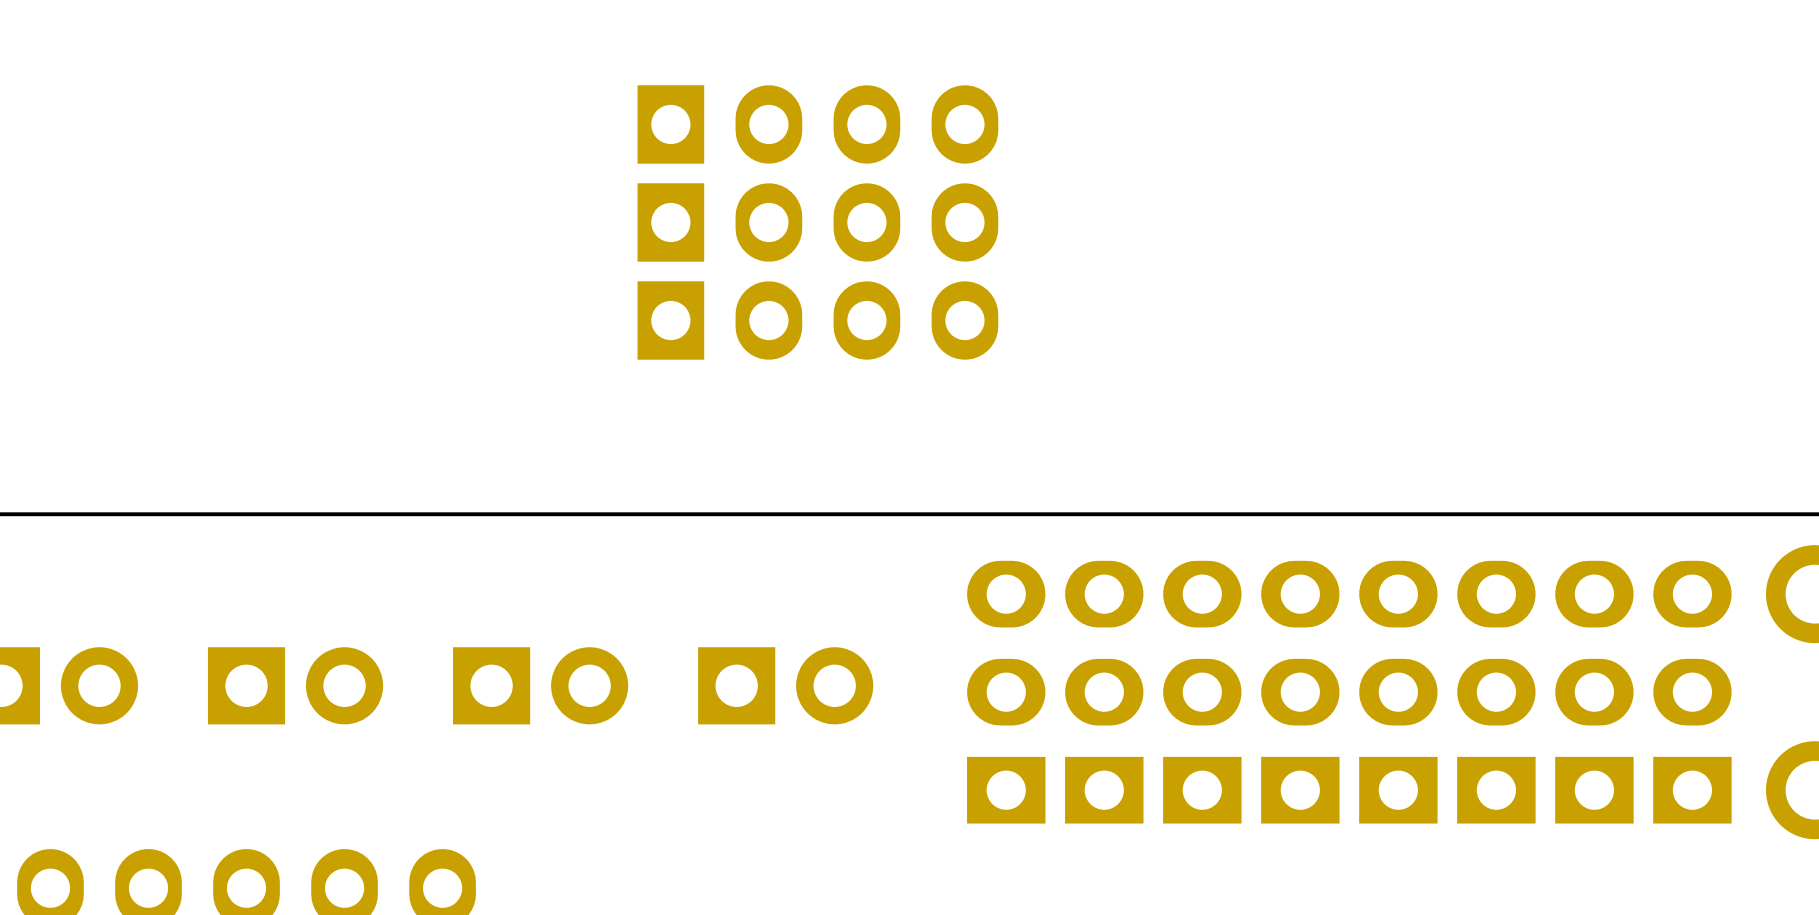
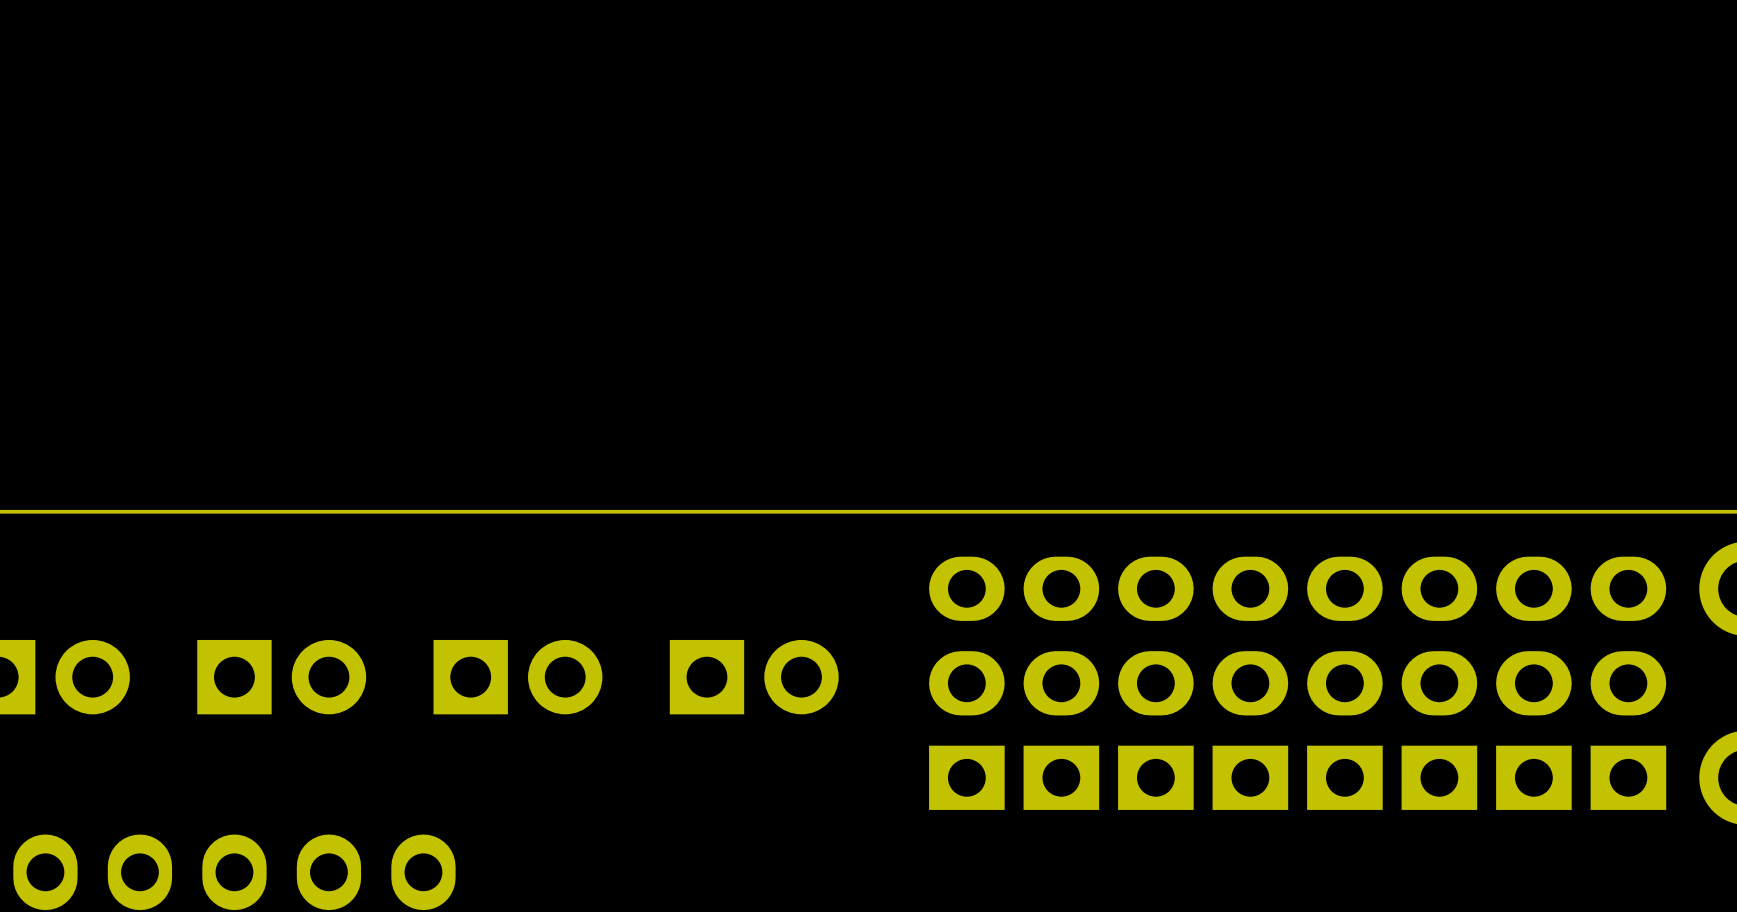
part: (817, 124) -> none
part: (817, 222) -> none
part: (817, 320) -> none

